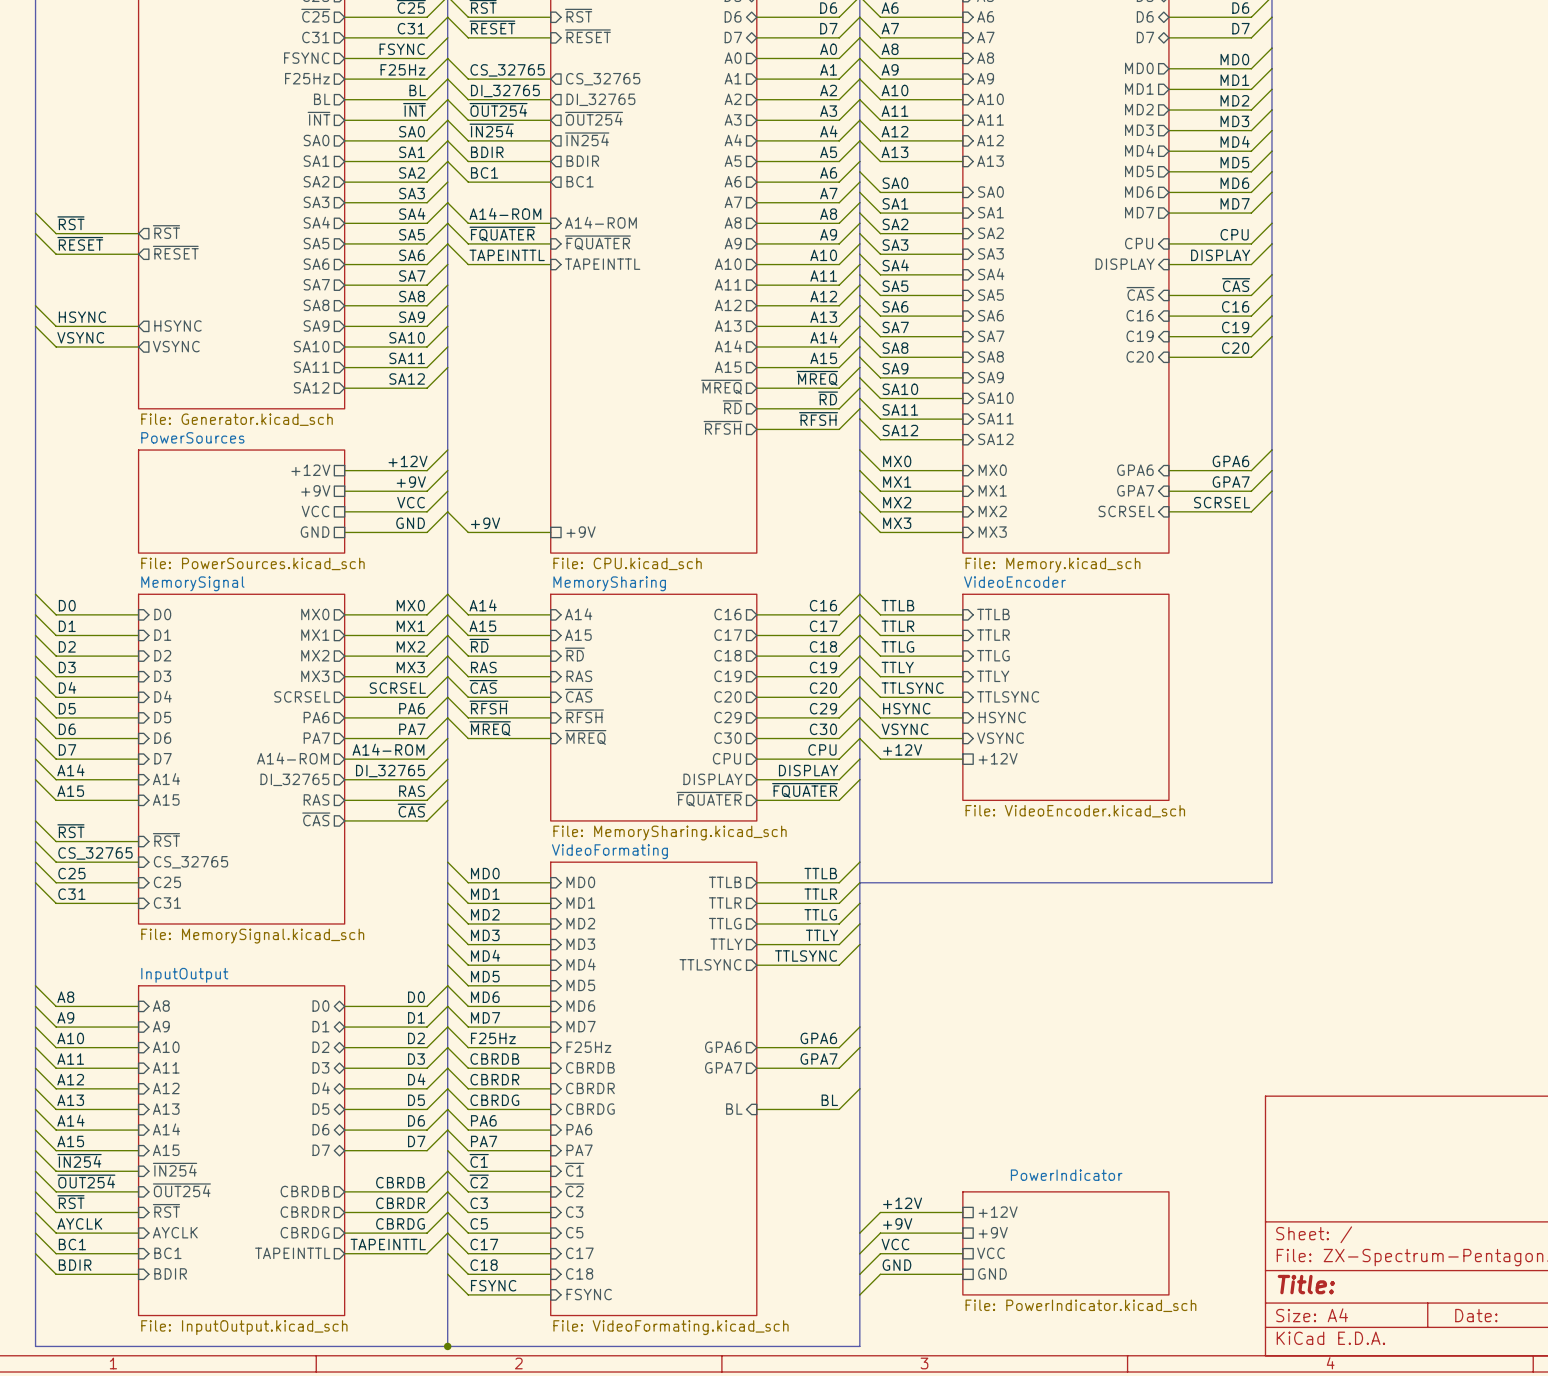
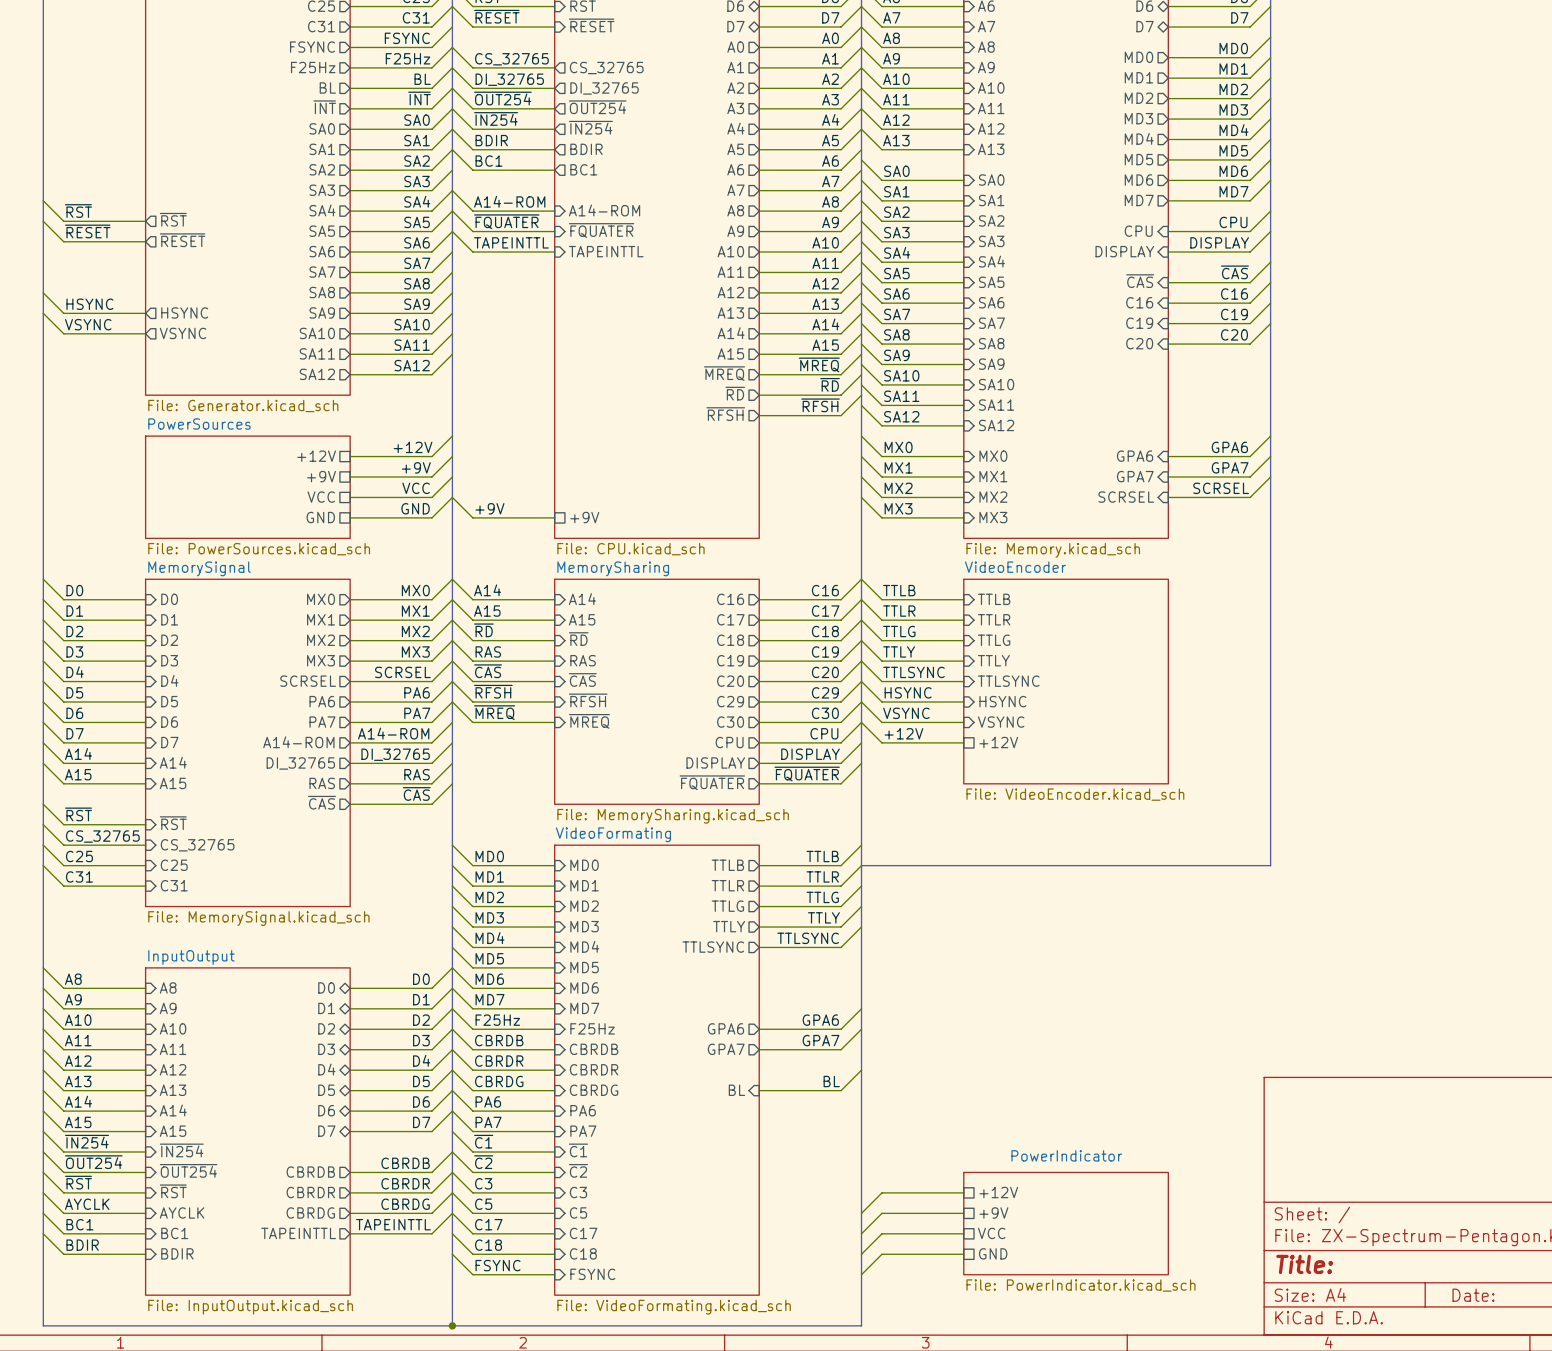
label: +12V (902, 1203) -> none
label: +9V (897, 1223) -> none
label: VCC (895, 1244) -> none
label: GND (896, 1265) -> none

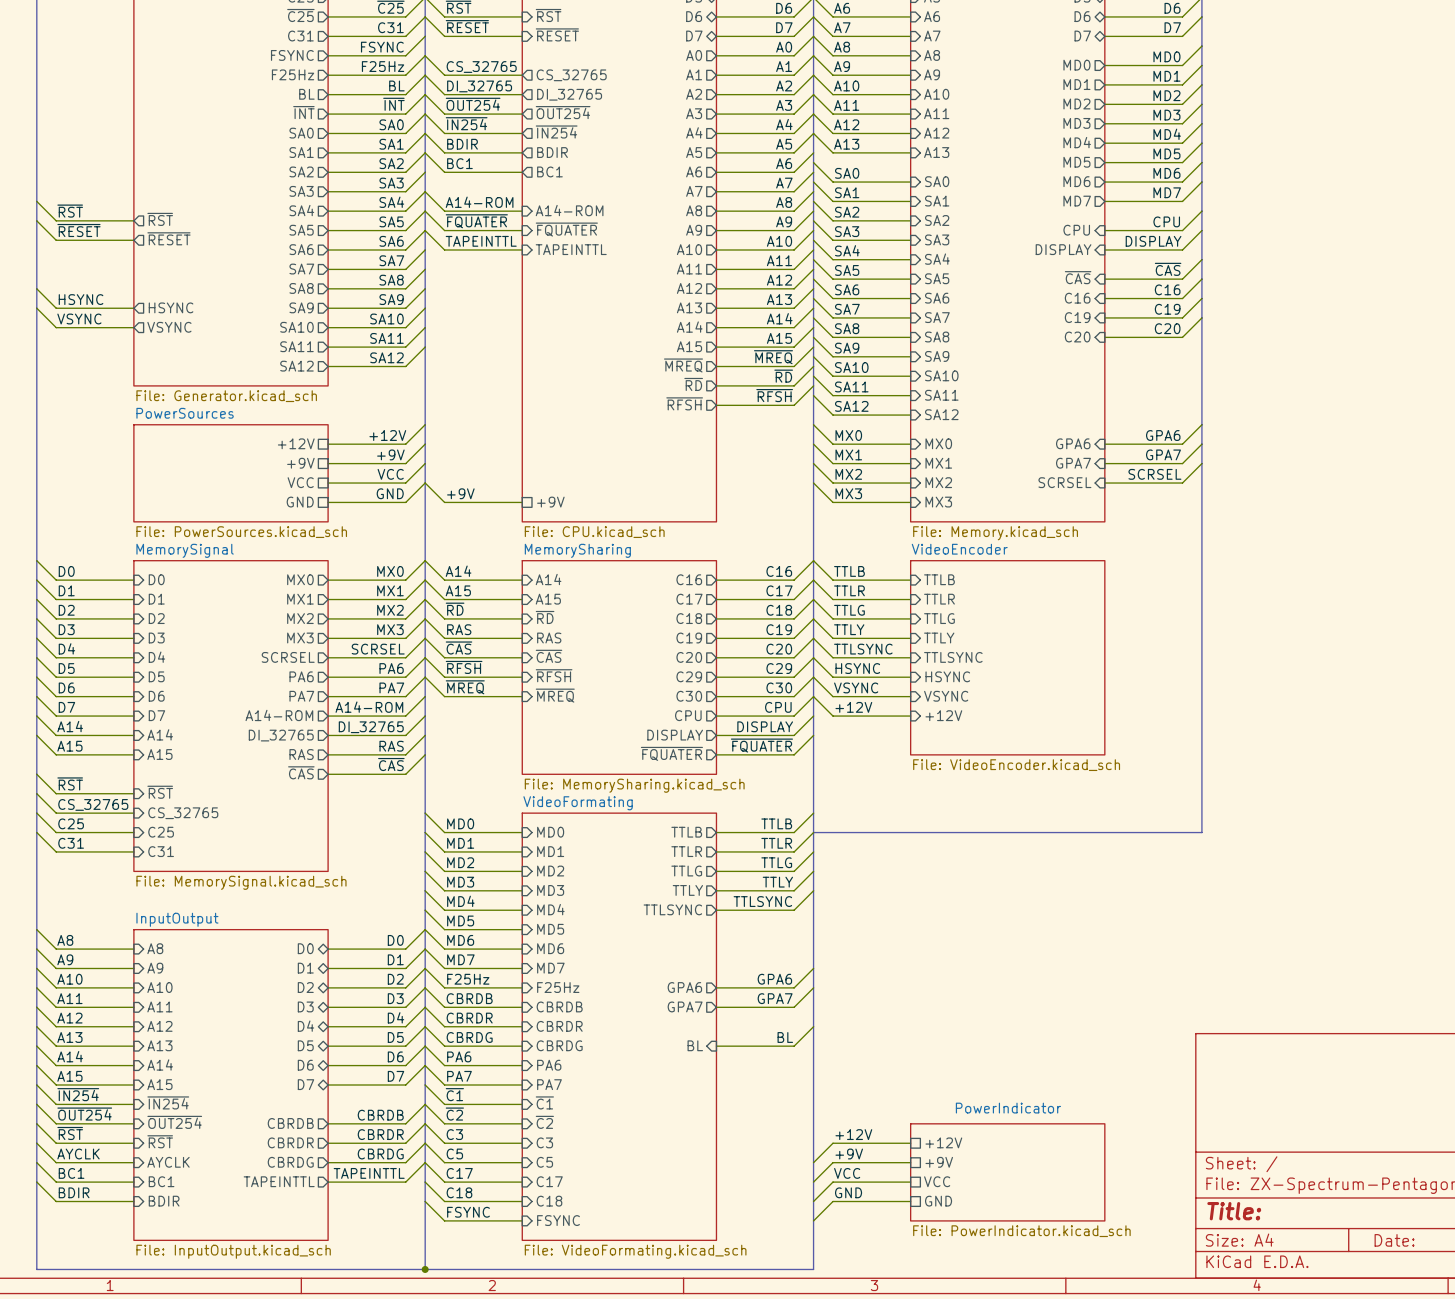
sheet pin shape: passive (998, 742) -> input (943, 715)
label: none -> +12V (853, 1134)
label: none -> +9V (849, 1154)
label: none -> VCC (847, 1173)
label: none -> GND (848, 1192)

